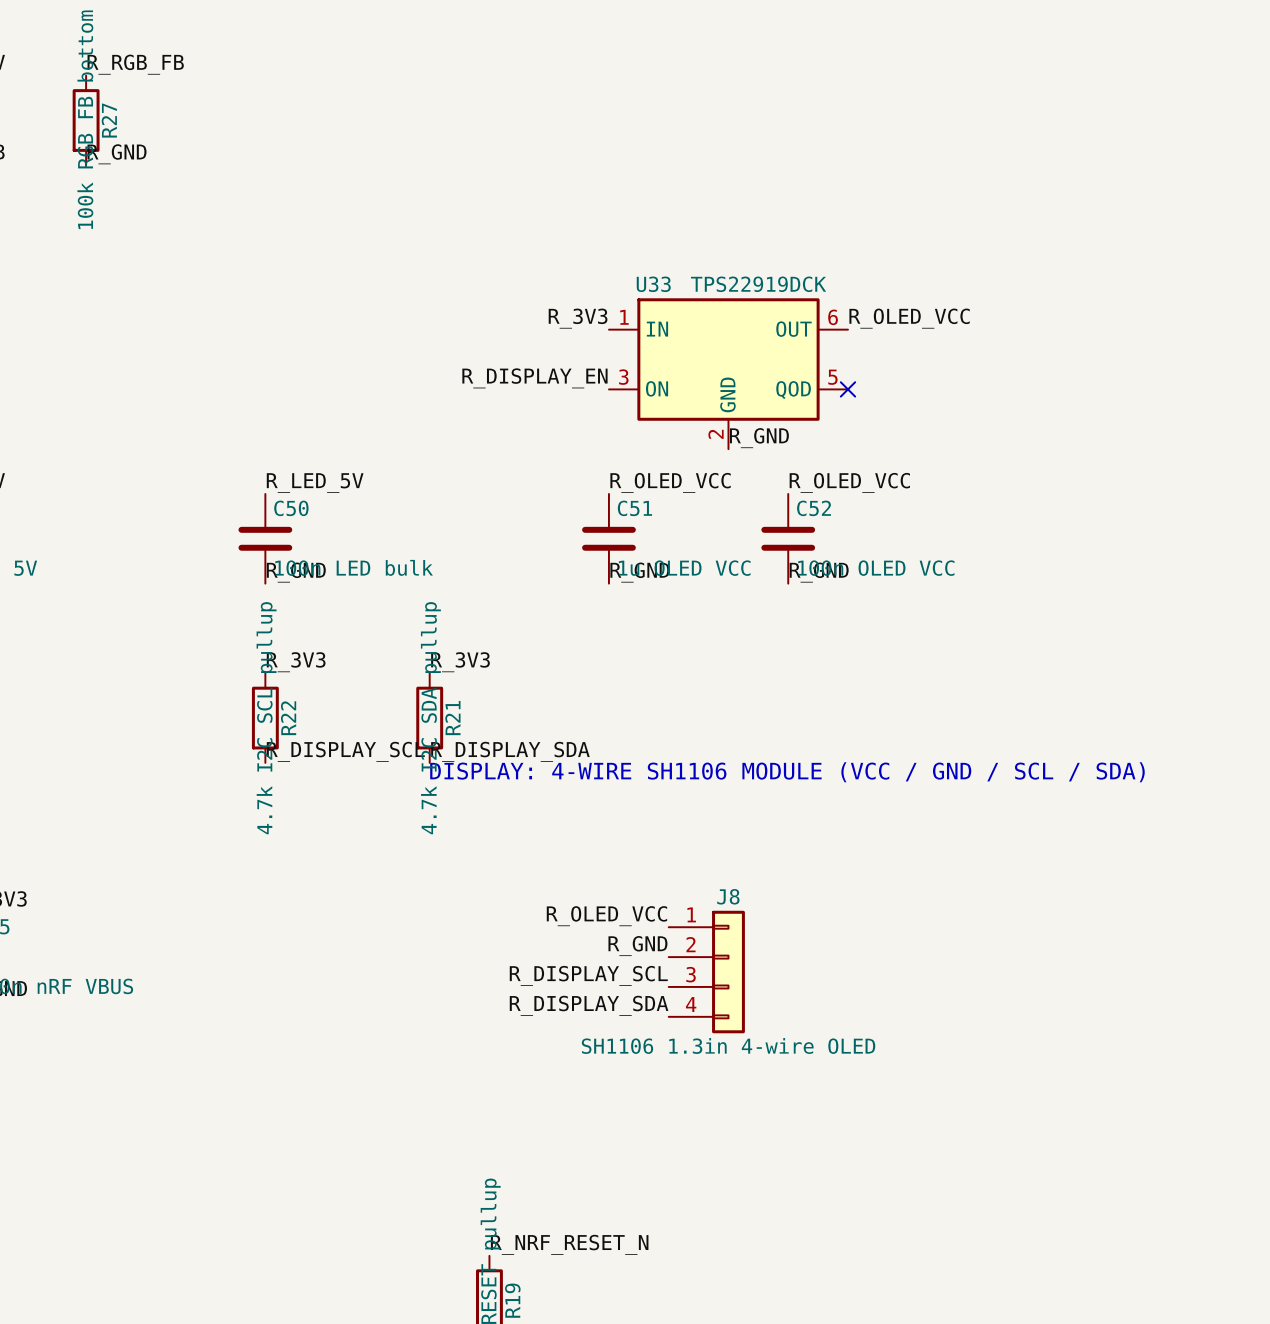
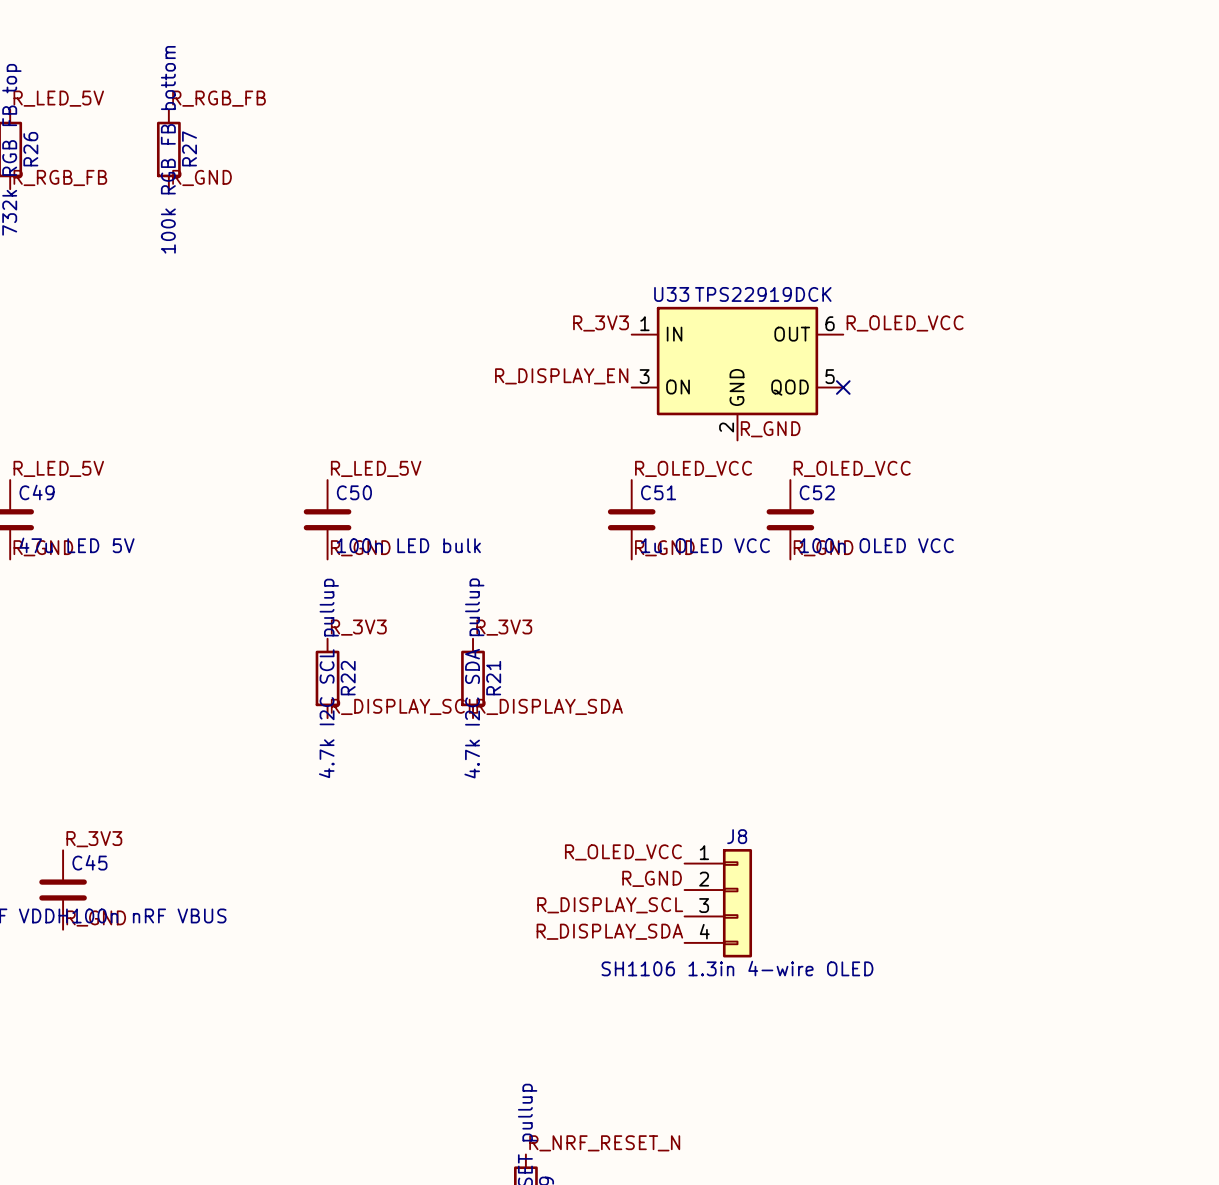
text: DISPLAY: 4-WIRE SH1106 MODULE (VCC / GND / SCL / SDA) (787, 772) -> none

